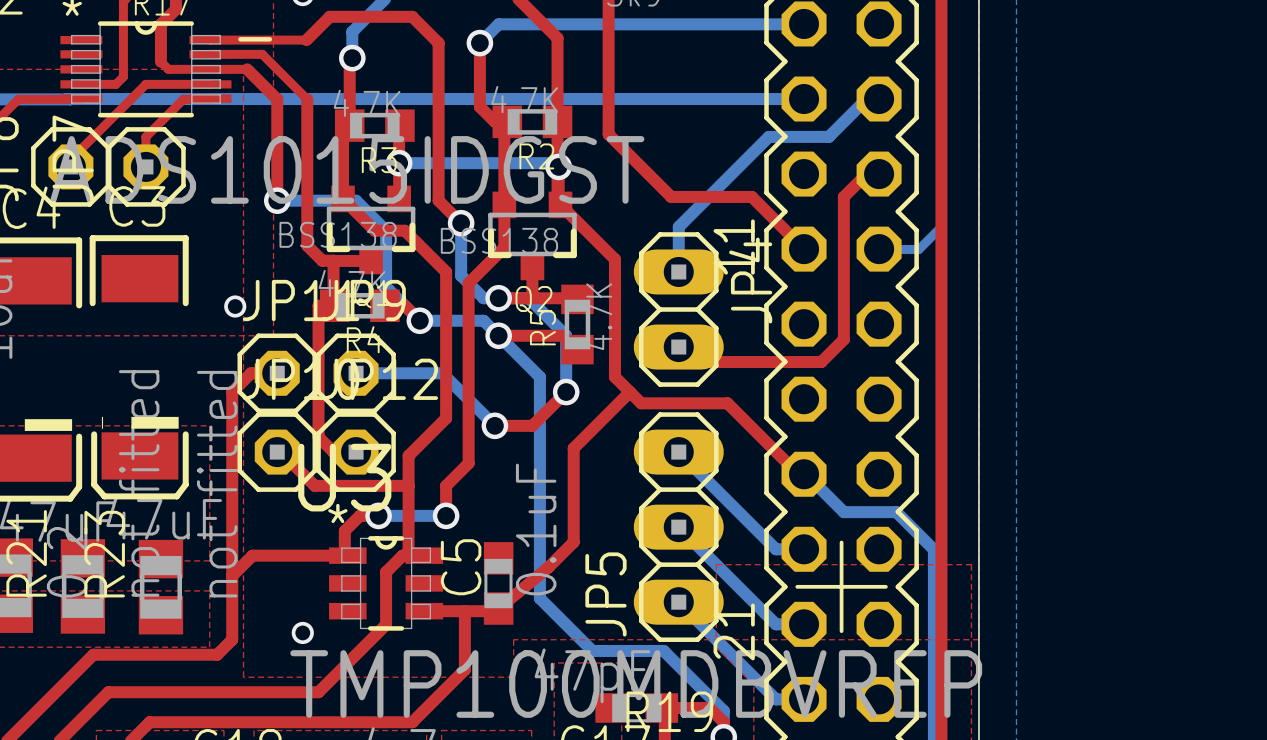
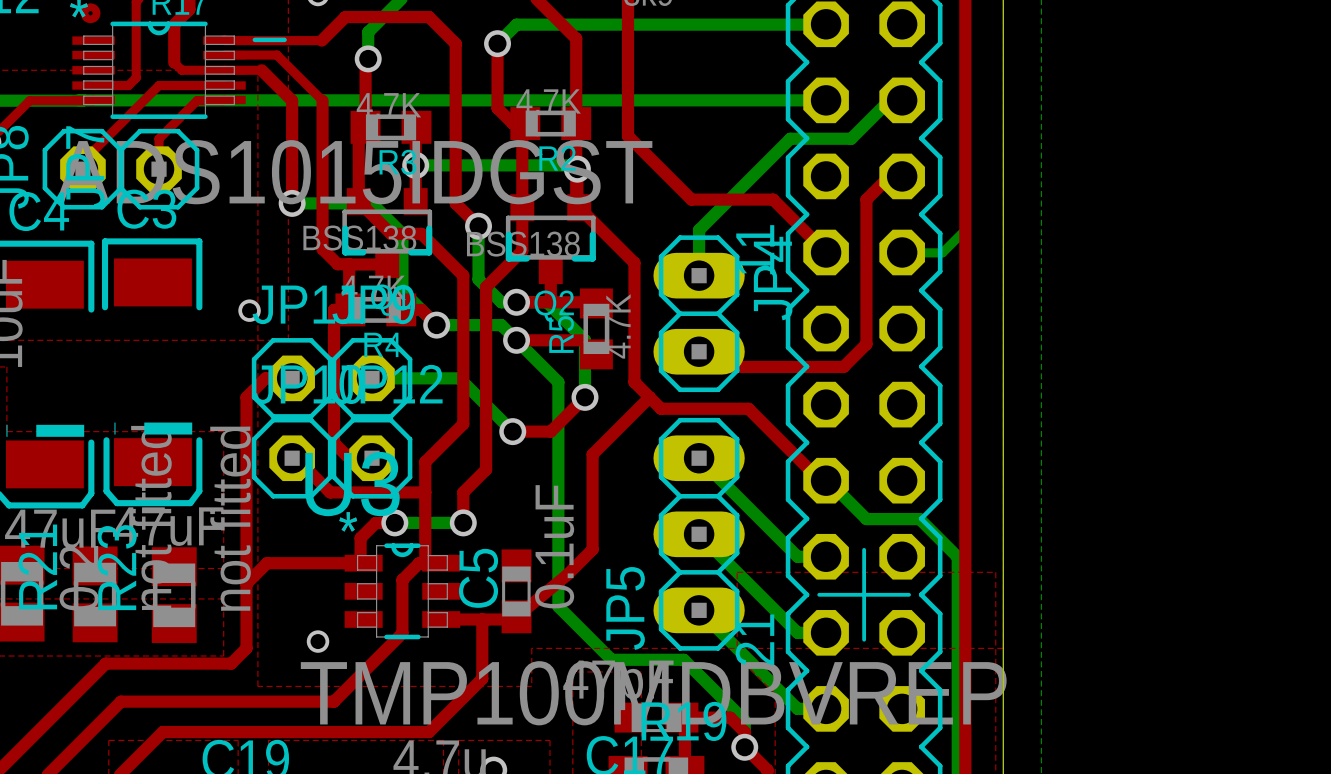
drawing: none -> [80, 3, 101, 24]

